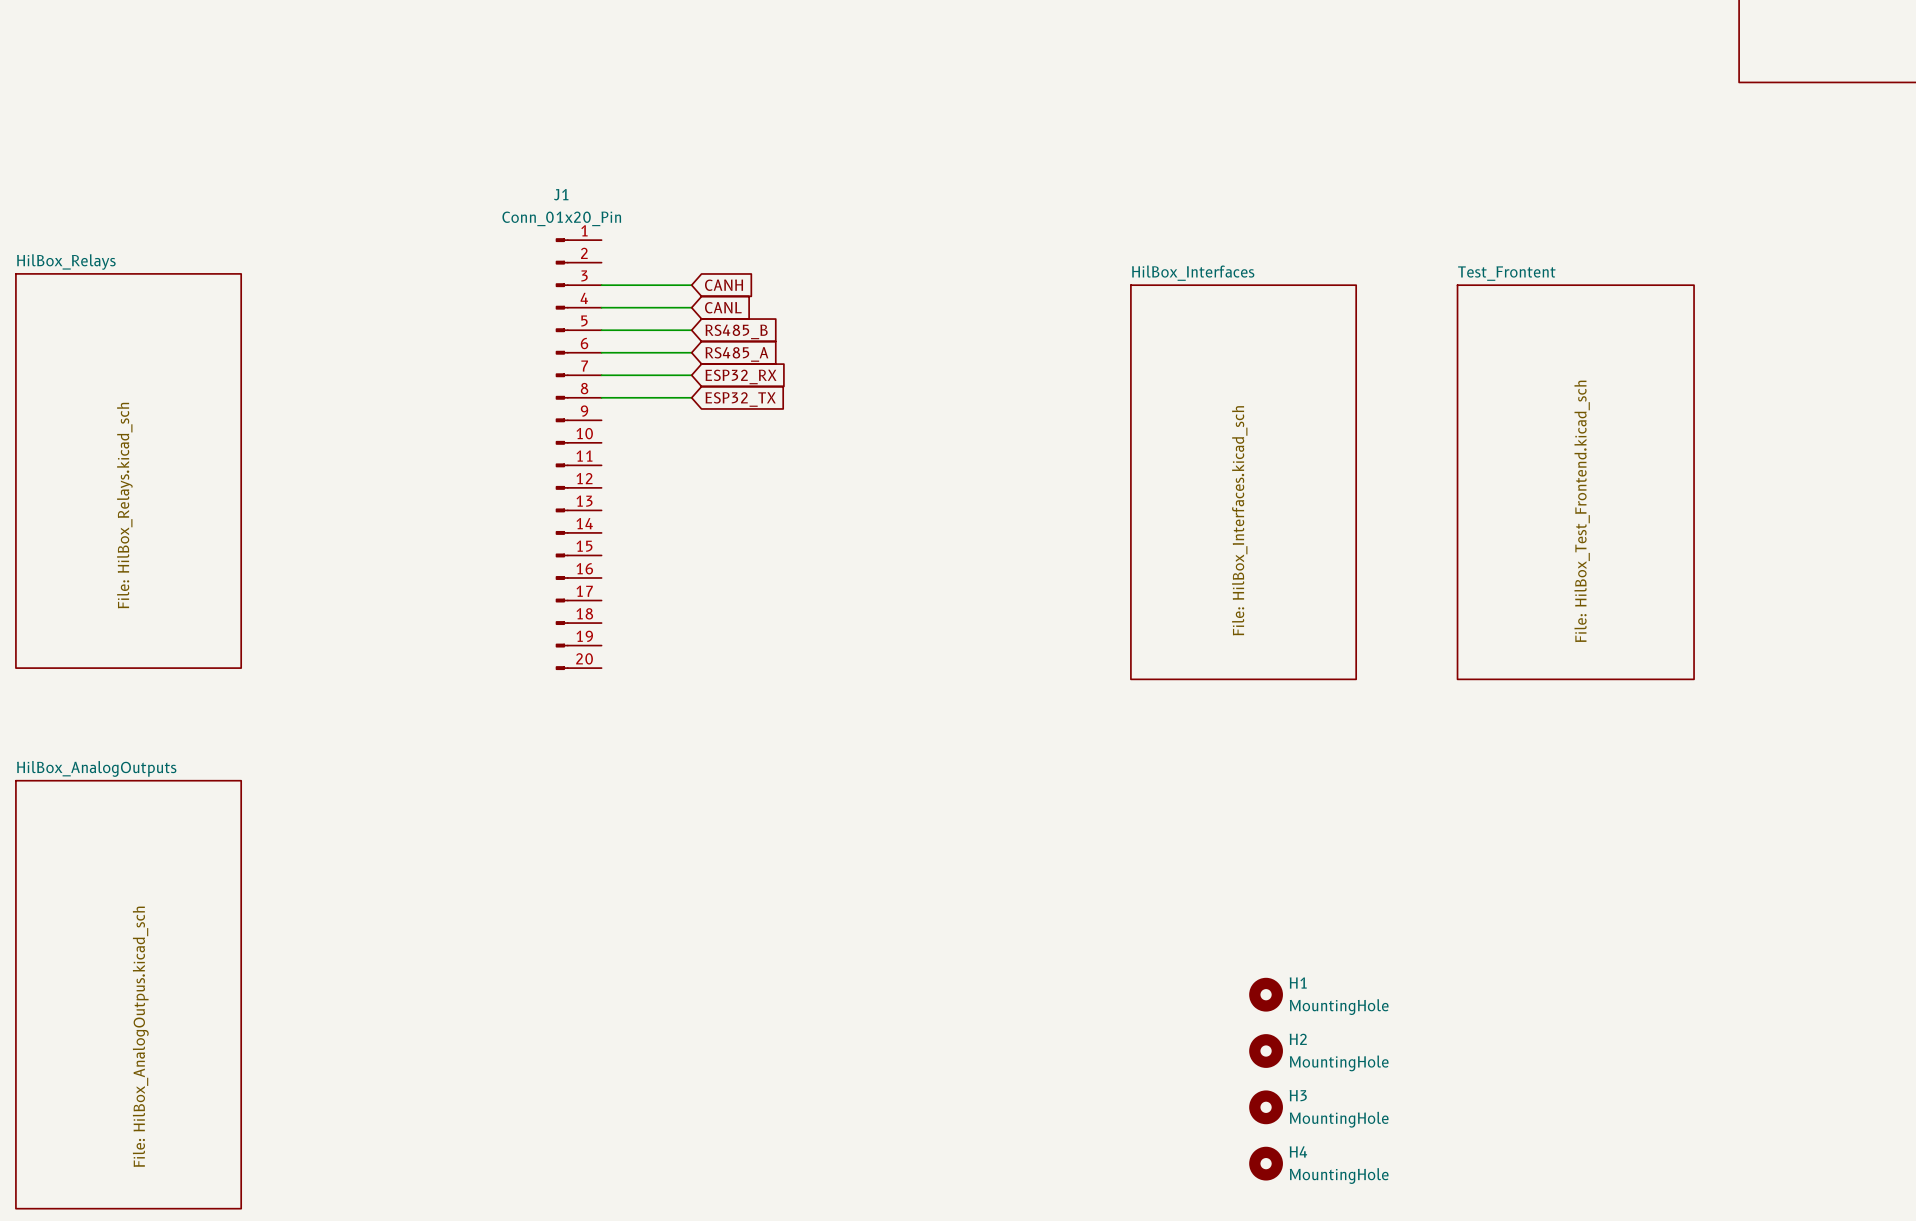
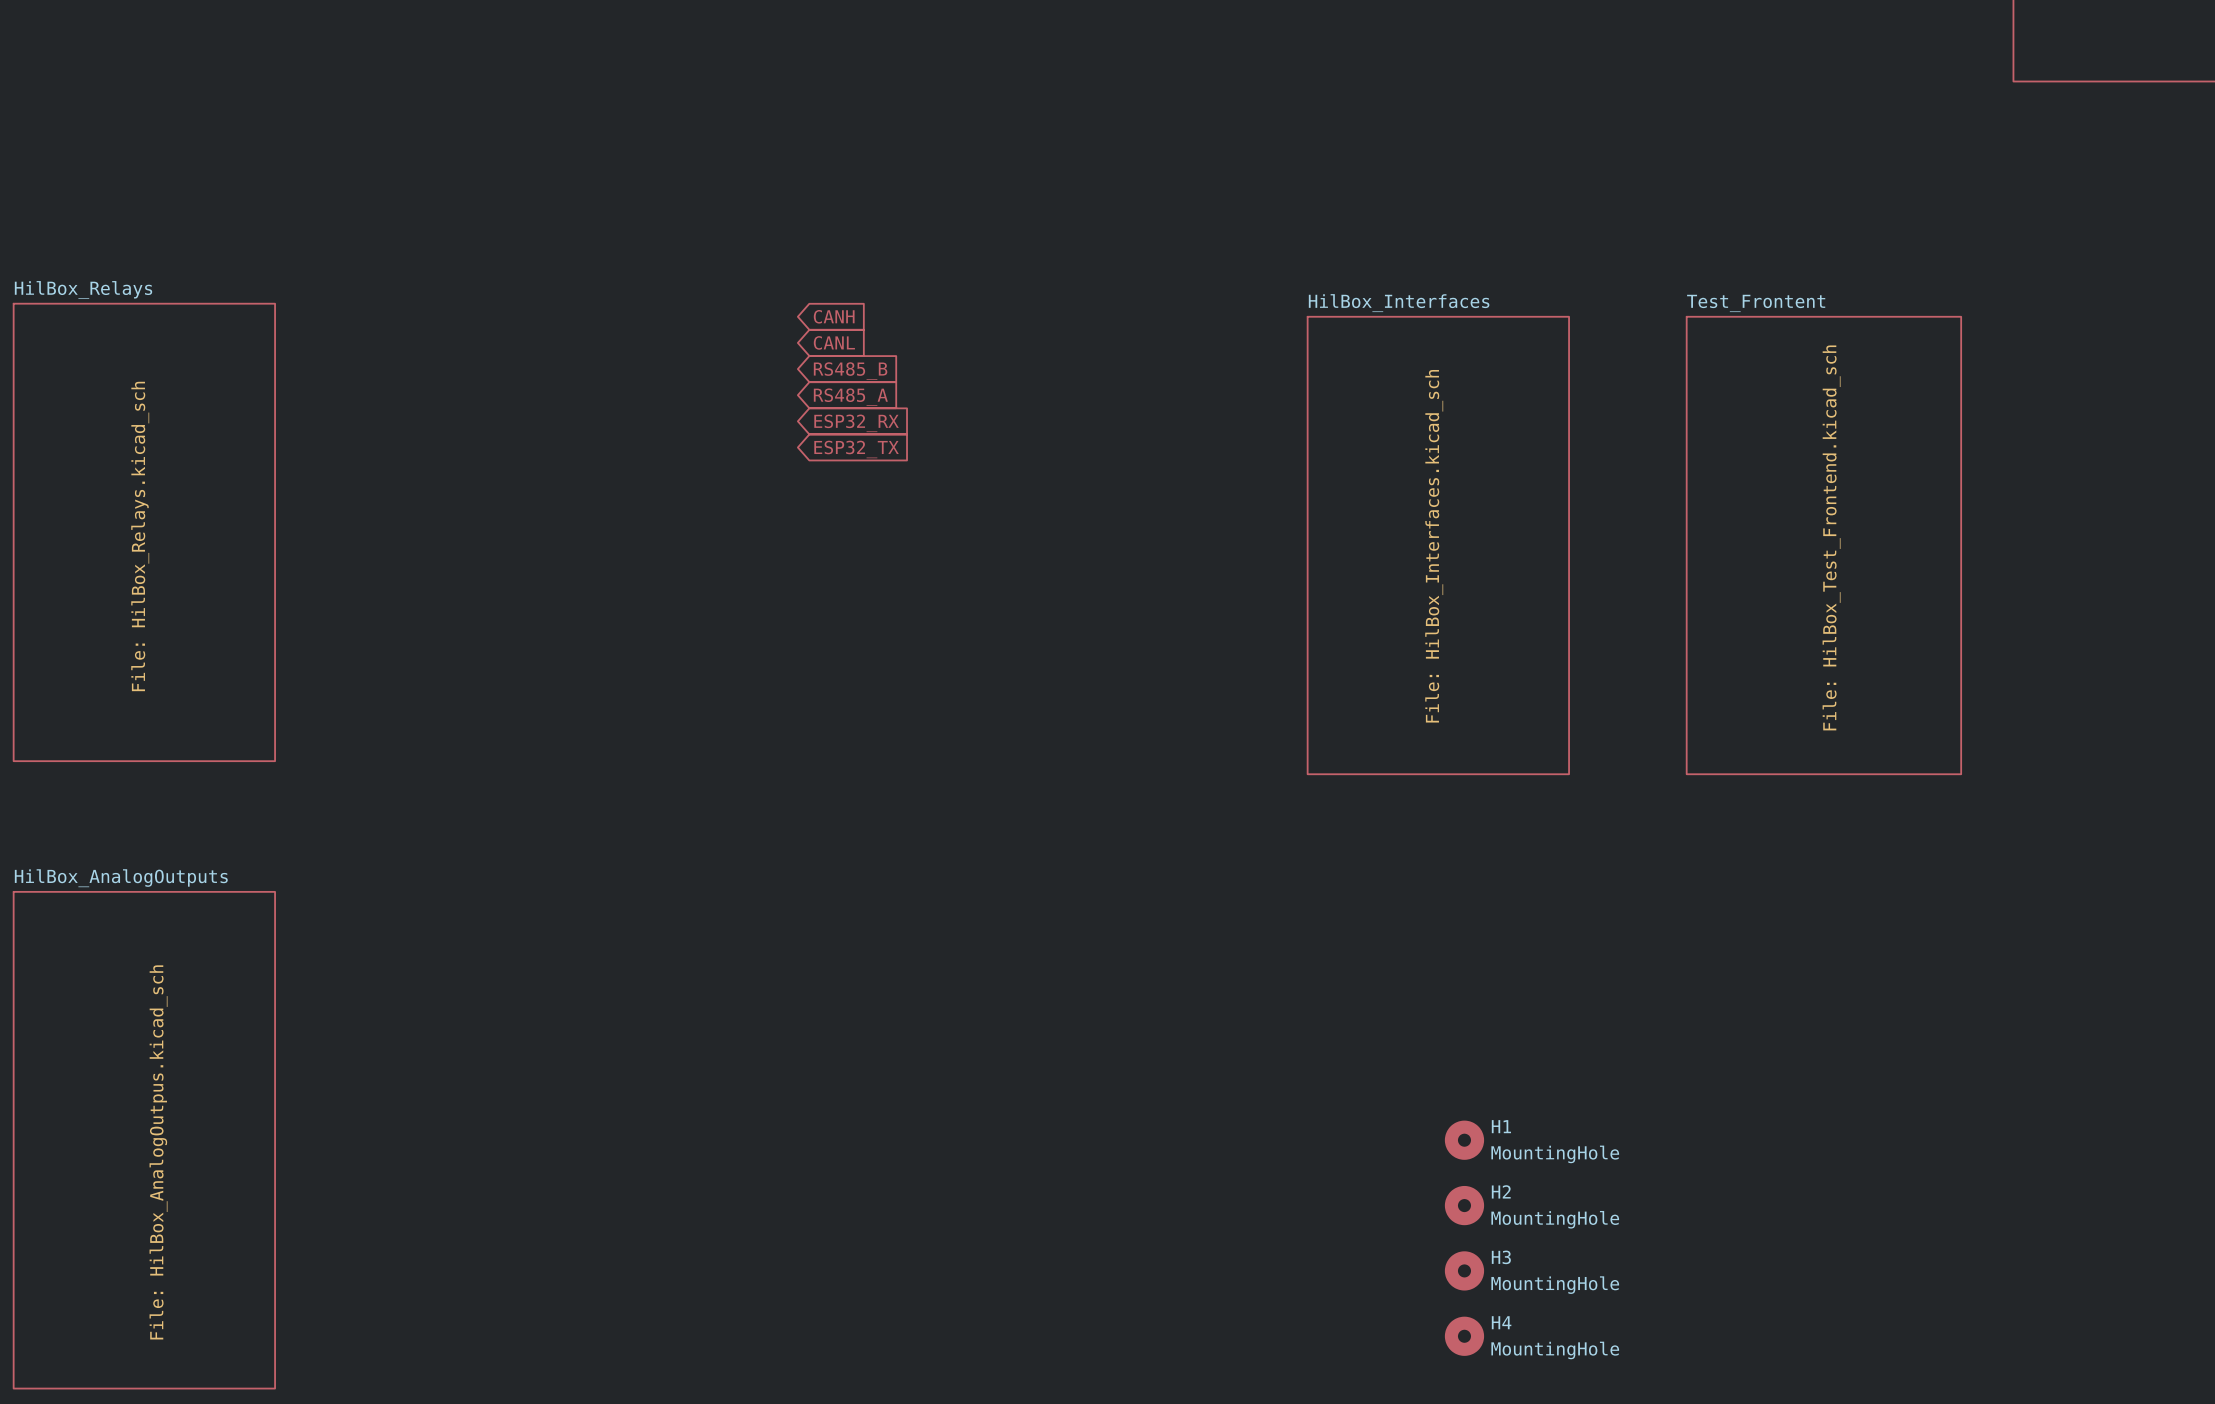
wire: (601, 285) (691, 285) -> none
wire: (601, 307) (691, 307) -> none
wire: (601, 330) (691, 330) -> none
wire: (601, 352) (691, 352) -> none
wire: (601, 375) (691, 375) -> none
wire: (601, 397) (691, 397) -> none
J1: Conn_01x20_Pin (578, 454) -> none

